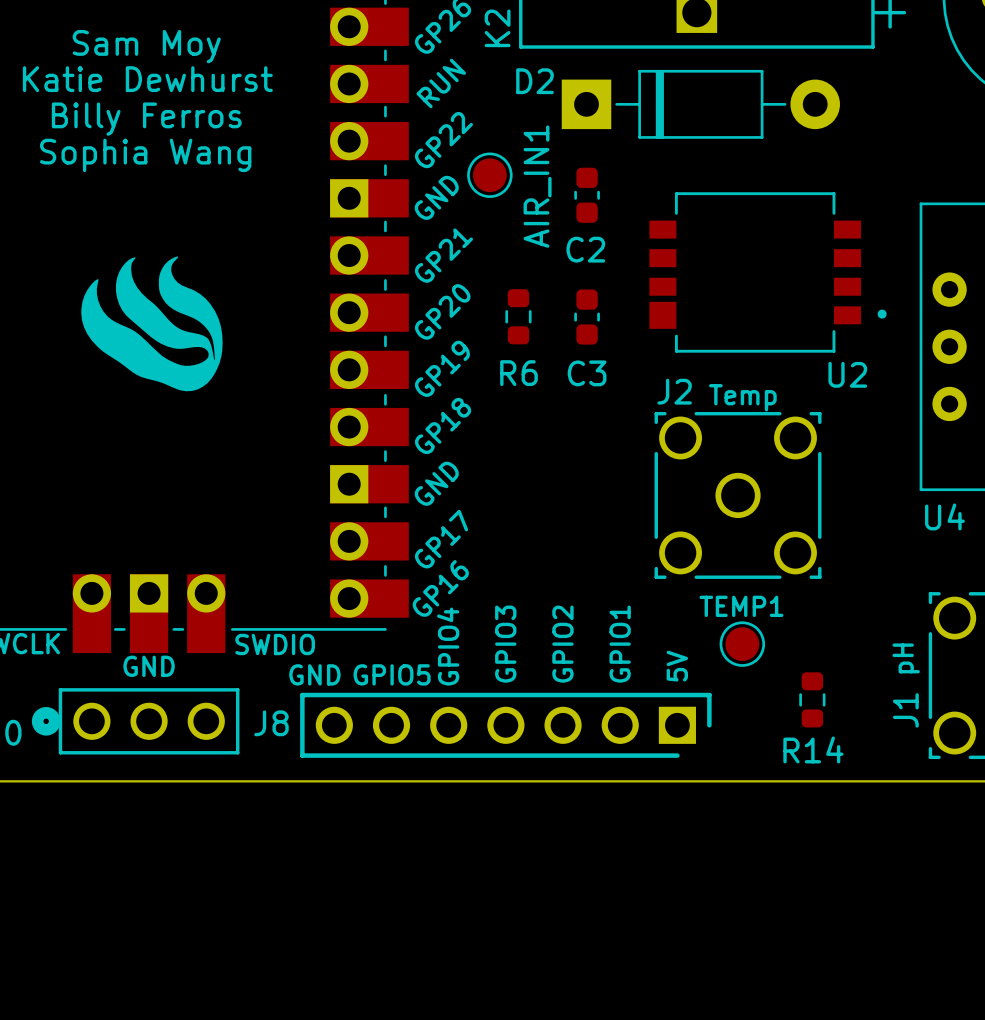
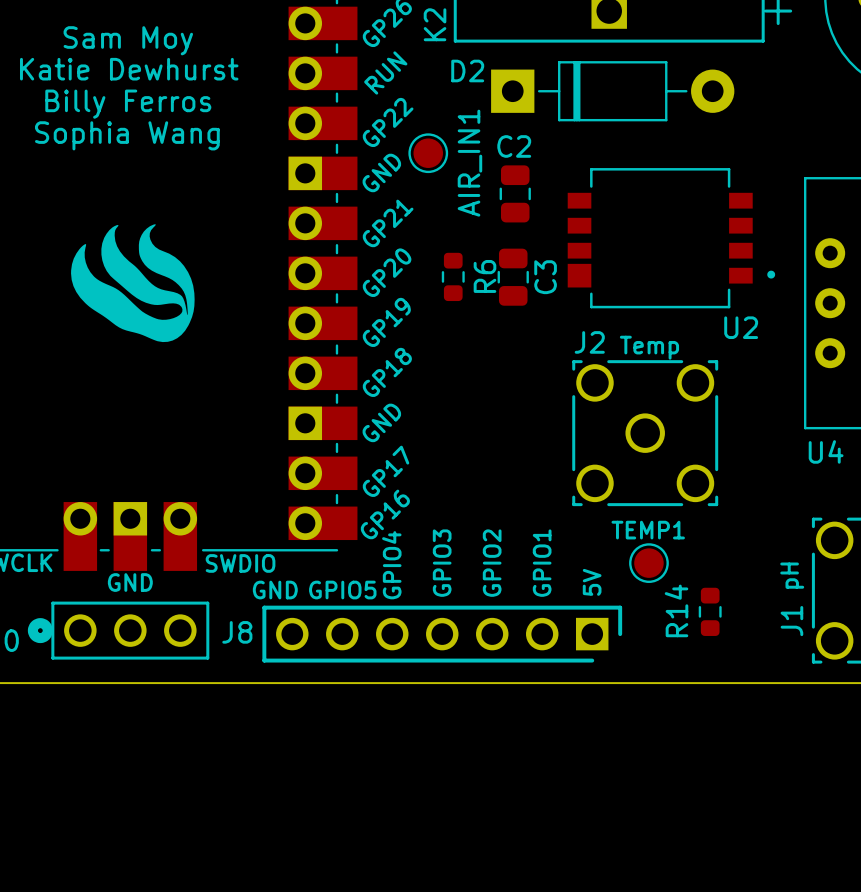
C2 footprint: [574, 167, 600, 223] -> [499, 165, 531, 223]
C2 name position: C2 (585, 249) -> C2 (514, 146)
C3 footprint: [574, 289, 600, 345] -> [497, 248, 529, 306]
R6 name rotation: 0° (518, 373) -> 90° counterclockwise (484, 276)
R6 name position: R6 (518, 373) -> R6 (484, 276)
C3 name rotation: 0° (587, 373) -> 90° counterclockwise (545, 277)
C3 name position: C3 (587, 373) -> C3 (545, 277)
R14 name rotation: 0° (813, 749) -> 90° counterclockwise (676, 610)

